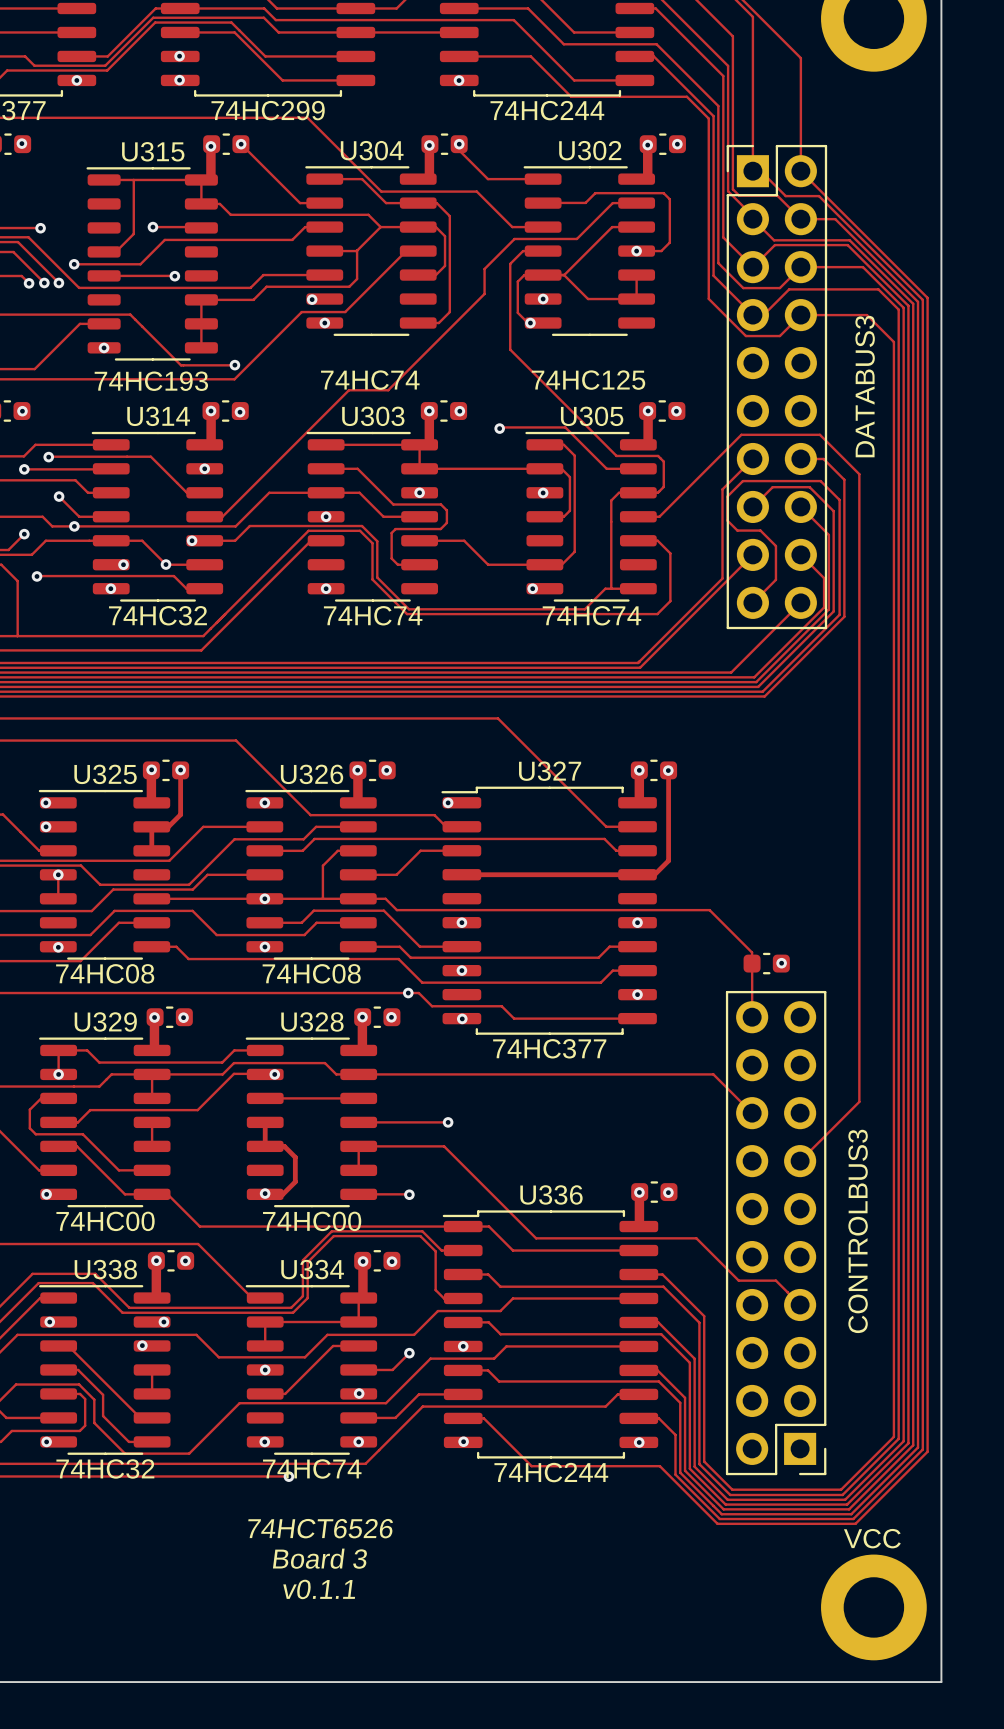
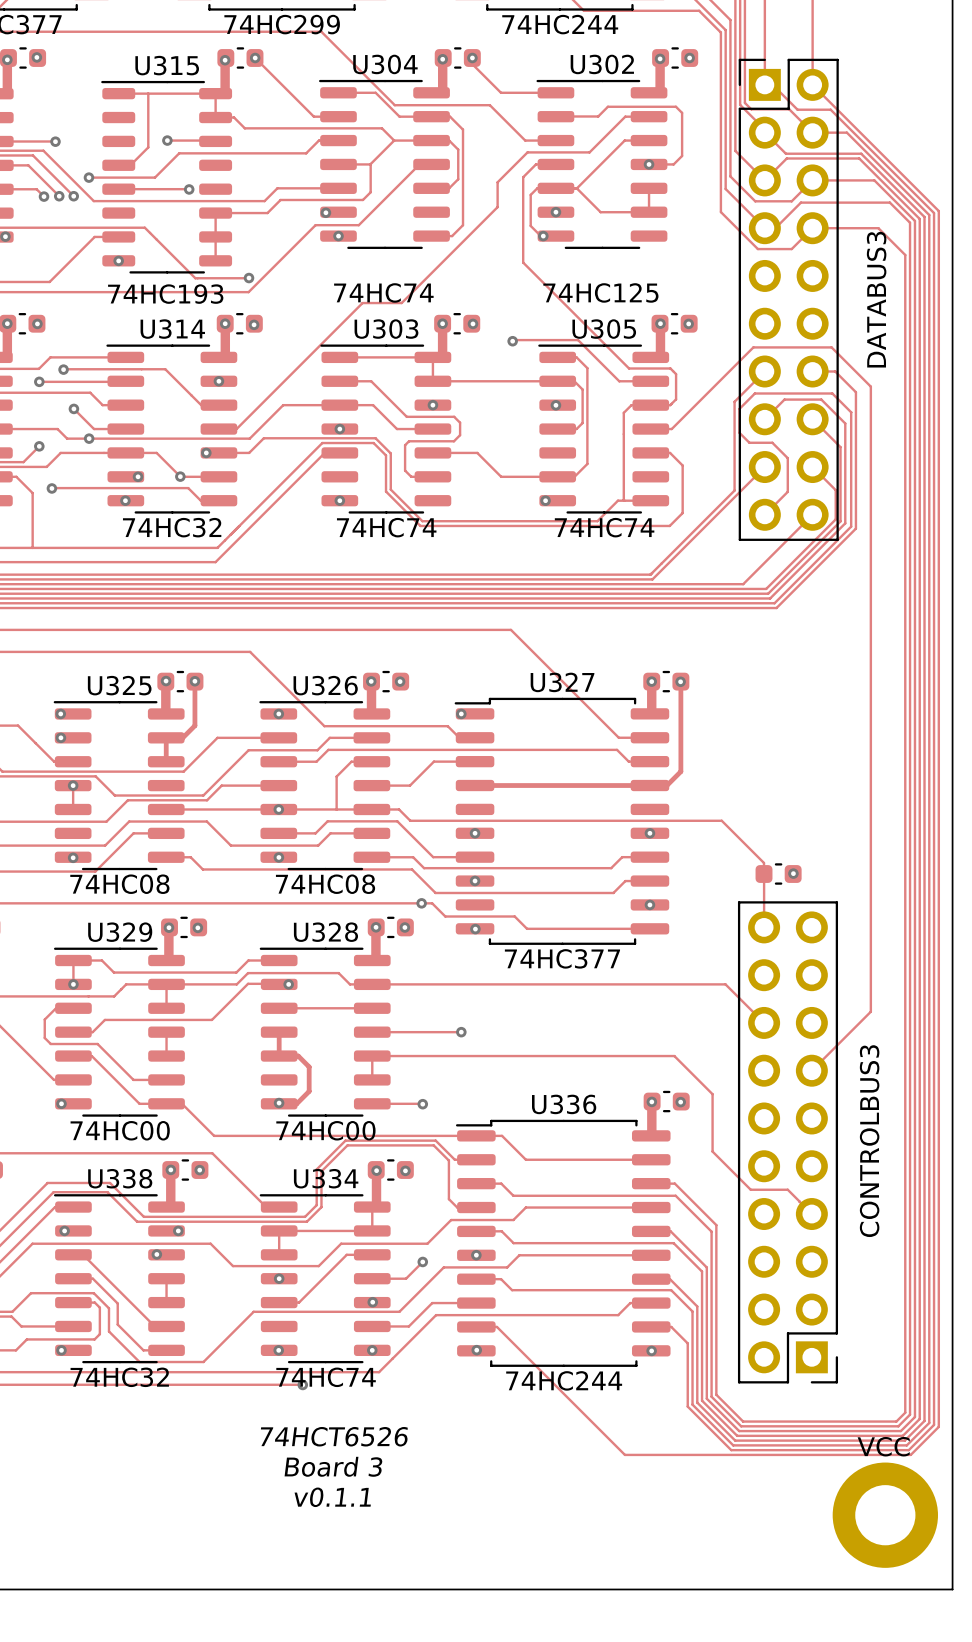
track: (444, 1146) (536, 1238) (696, 1238) (700, 1242) -> (457, 1056) (674, 1056) (712, 1094) (712, 1151)
track: (893, 1436) (841, 1489) (732, 1489) (704, 1461) -> (905, 1345) (905, 1412) (896, 1421) (743, 1421) (716, 1394) (716, 1369)
track: (898, 1438) (842, 1494) (730, 1494) (699, 1464) -> (910, 1347) (910, 1414) (898, 1426) (741, 1426) (711, 1396) (711, 1372)
track: (903, 1441) (845, 1499) (727, 1499) (694, 1466) -> (914, 1349) (914, 1417) (900, 1431) (739, 1431) (706, 1398) (706, 1375)
track: (908, 1443) (847, 1504) (725, 1504) (689, 1468) -> (919, 1351) (919, 1419) (902, 1435) (737, 1435) (702, 1400) (702, 1377)
track: (913, 1445) (849, 1509) (723, 1509) (685, 1470) -> (924, 1353) (924, 1420) (904, 1440) (735, 1440) (697, 1402) (697, 1379)
track: (918, 1447) (851, 1514) (721, 1514) (680, 1472) -> (929, 1355) (929, 1422) (906, 1445) (733, 1445) (692, 1404) (692, 1381)
track: (922, 1449) (853, 1519) (719, 1519) (675, 1474) -> (934, 1357) (934, 1424) (908, 1450) (731, 1450) (687, 1406) (687, 1383)
track: (927, 1451) (855, 1523) (717, 1523) (659, 1466) (531, 1466) -> (938, 1360) (938, 1426) (910, 1454) (624, 1454) (544, 1374)

